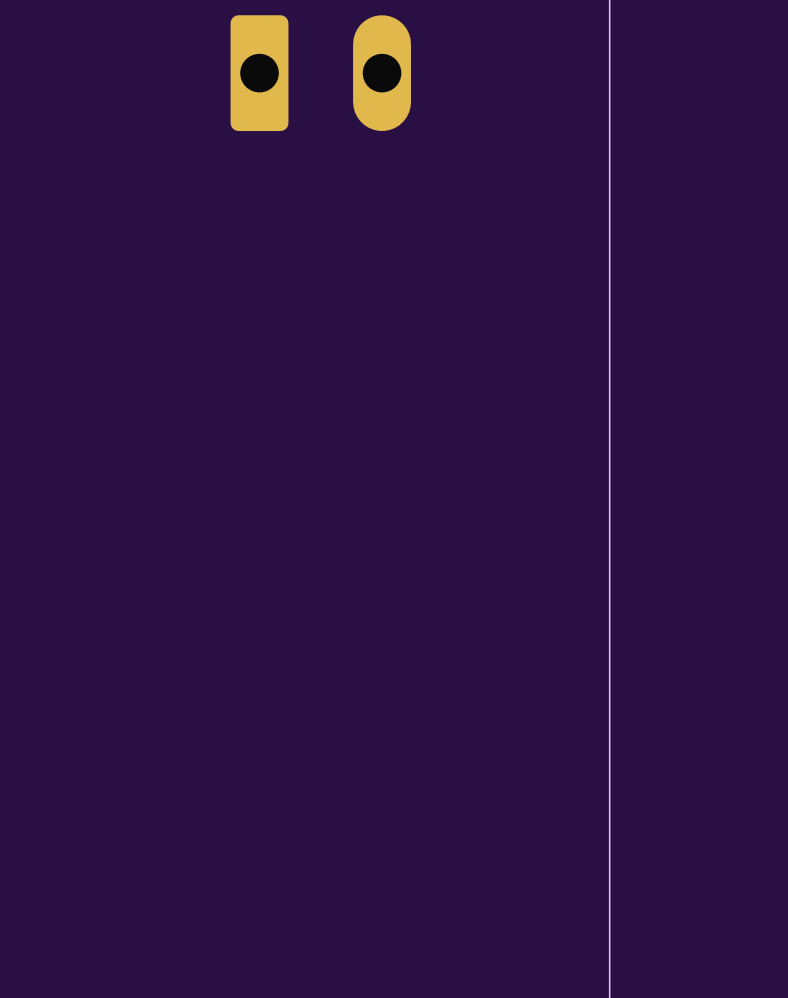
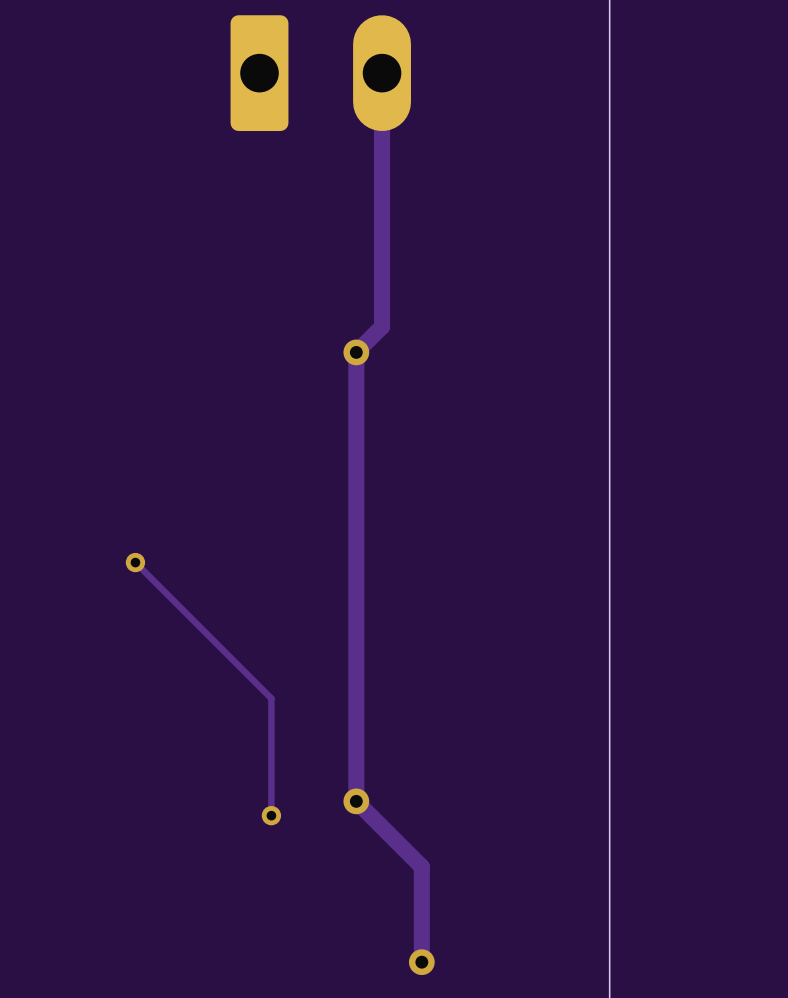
track: none -> (382, 73) (382, 326) (356, 352) (356, 801) (421, 866) (421, 962)
via: none -> (356, 352)
track: none -> (135, 562) (271, 698) (271, 815)
via: none -> (135, 562)
via: none -> (356, 801)
via: none -> (271, 815)
via: none -> (421, 962)

